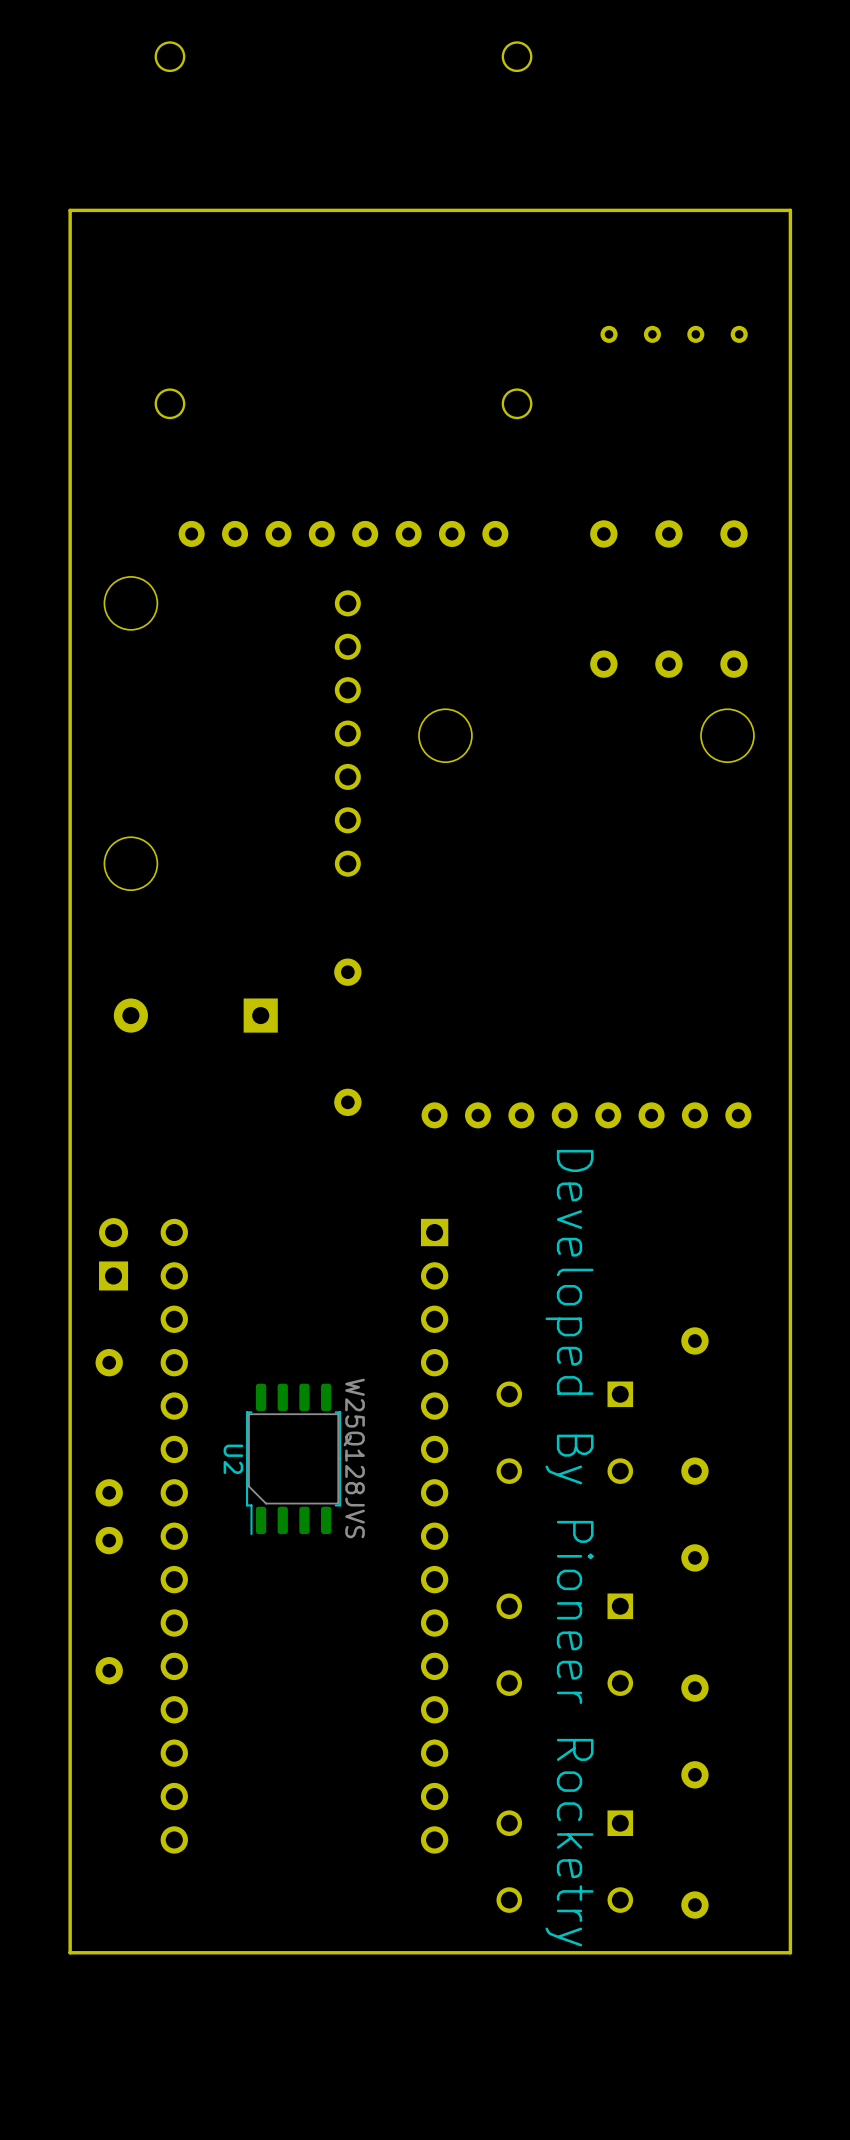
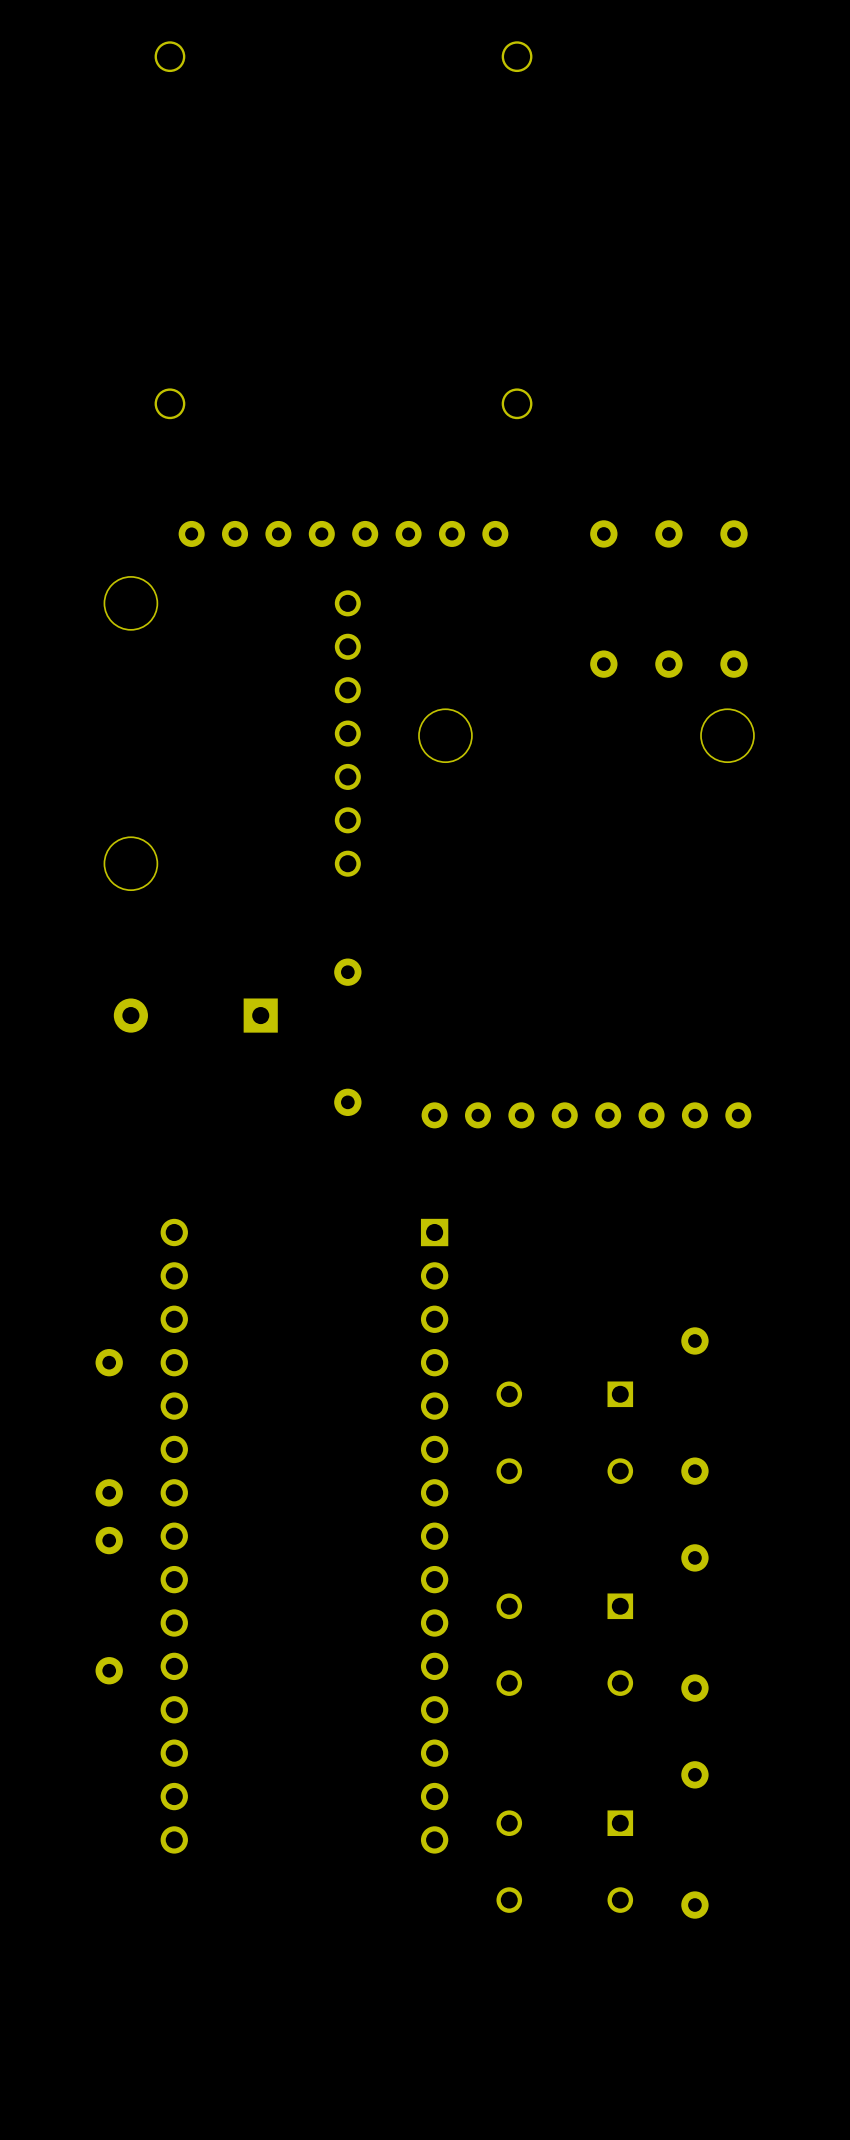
board edge: (790, 210) (70, 210) (70, 1952) (790, 1952) (790, 210) -> none
part: (674, 334) -> none
part: (113, 1254) -> none
U2: W25Q128JVS (293, 1459) -> none
text: Developed By Pioneer Rocketry (569, 1548) -> none

